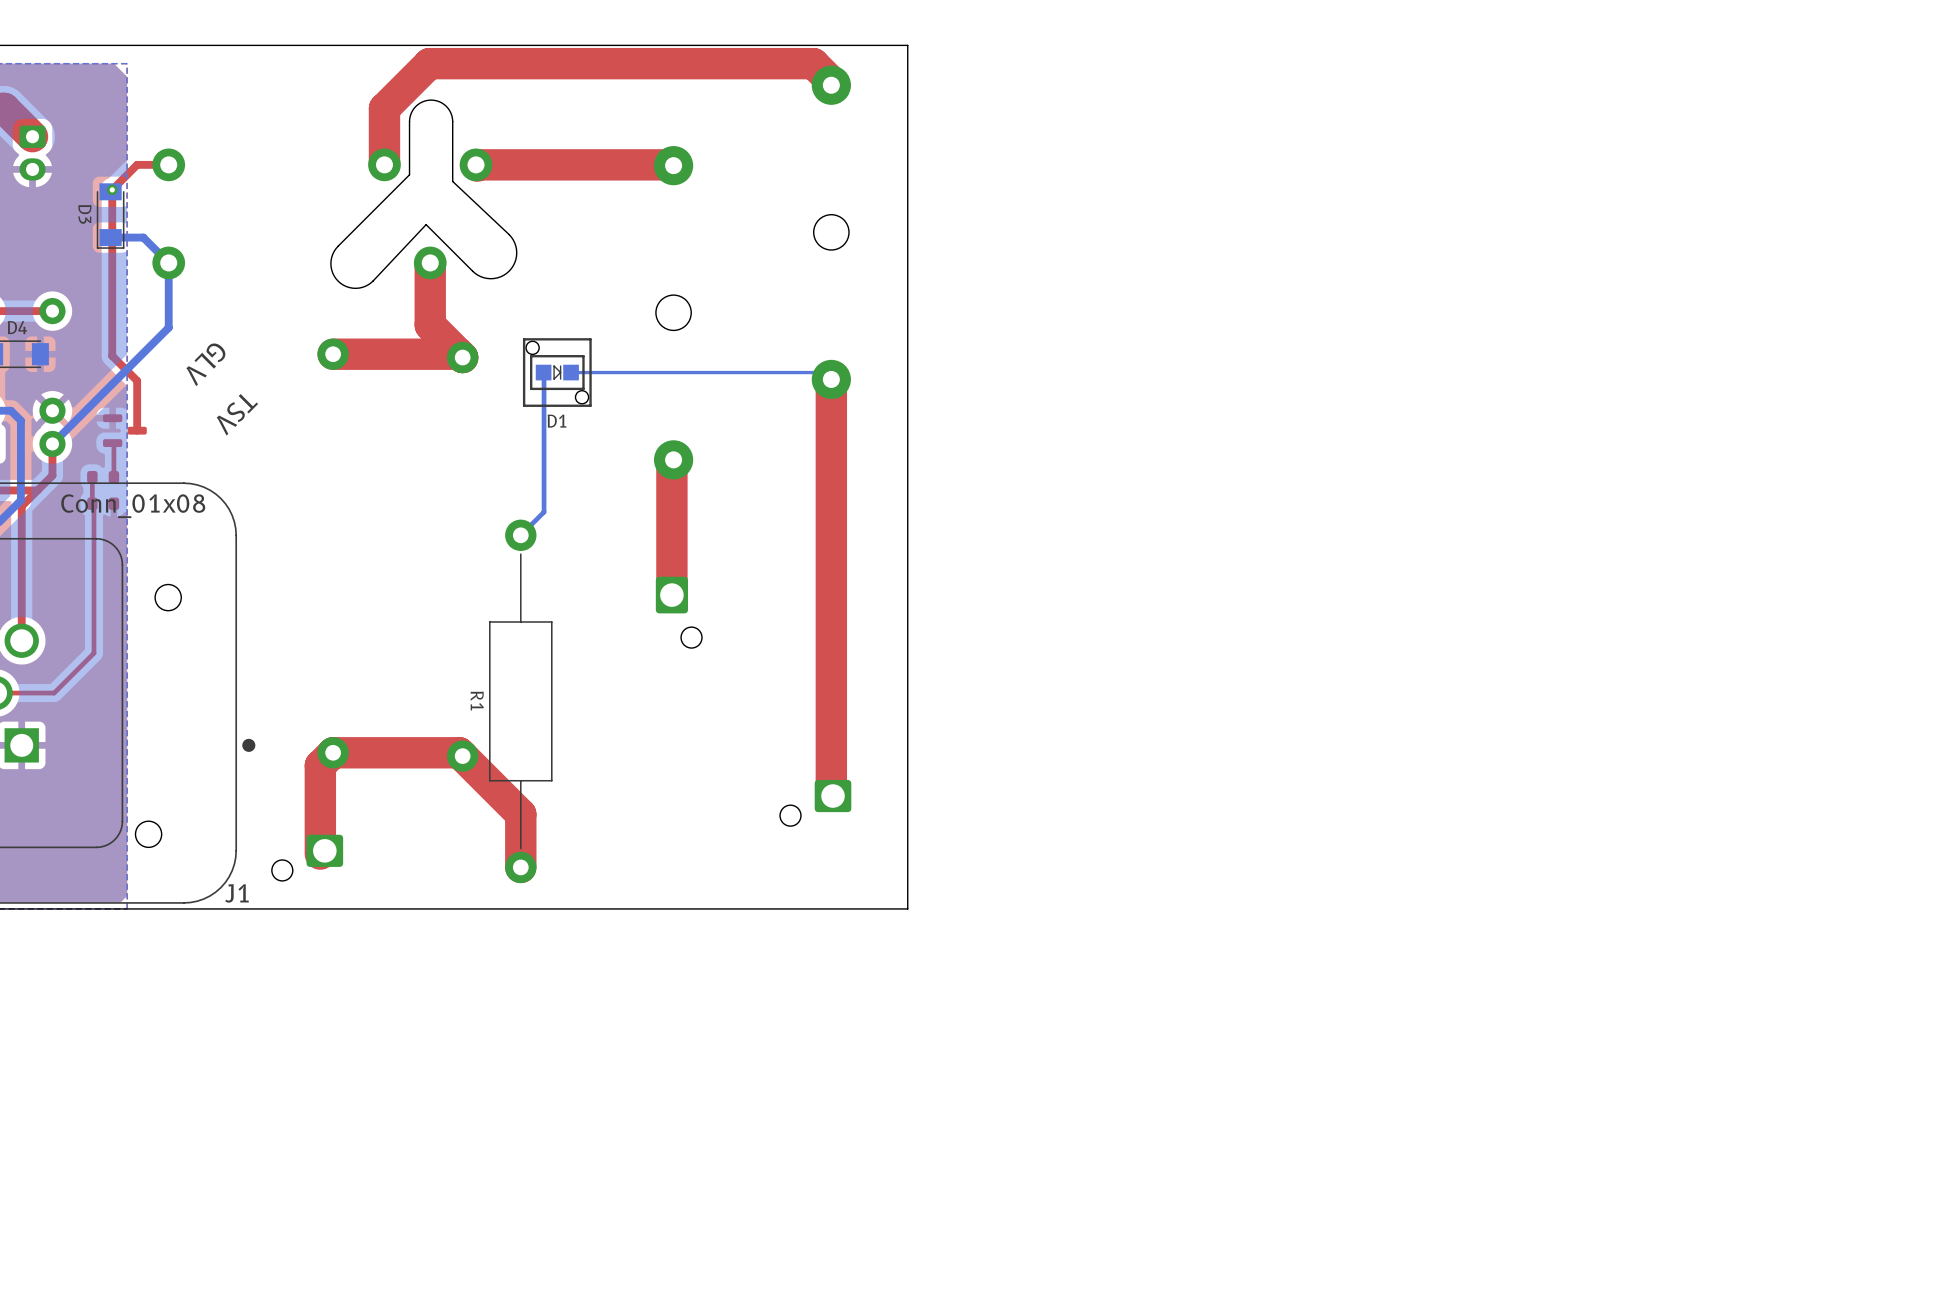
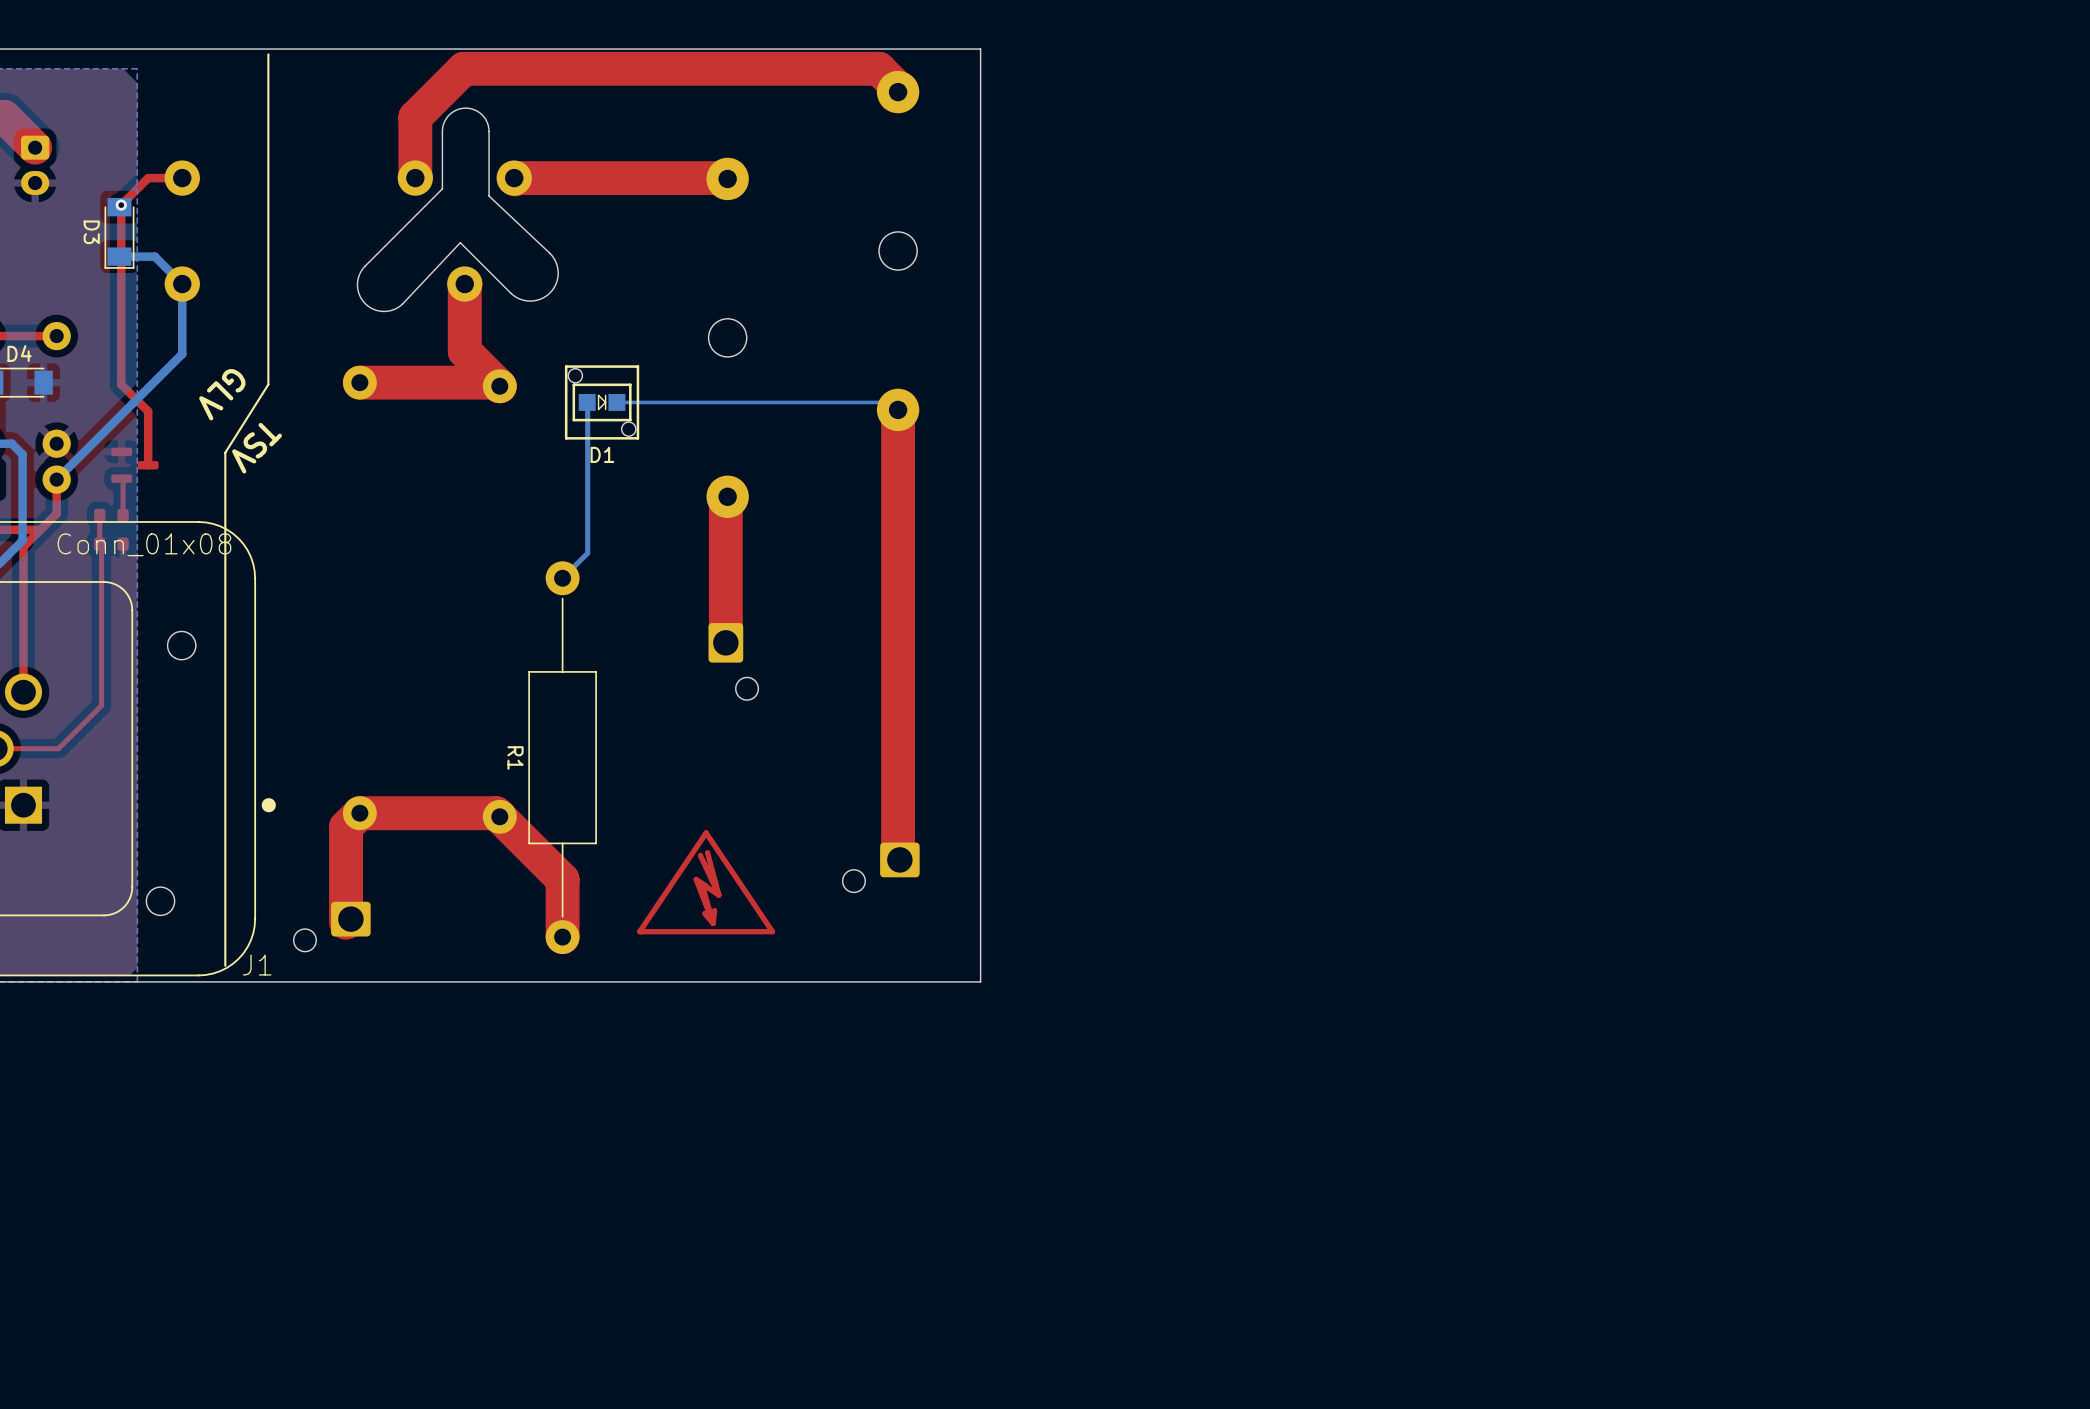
line: none -> (268, 54) (268, 384) (225, 452) (225, 965)
drawing: none -> [637, 830, 776, 935]

